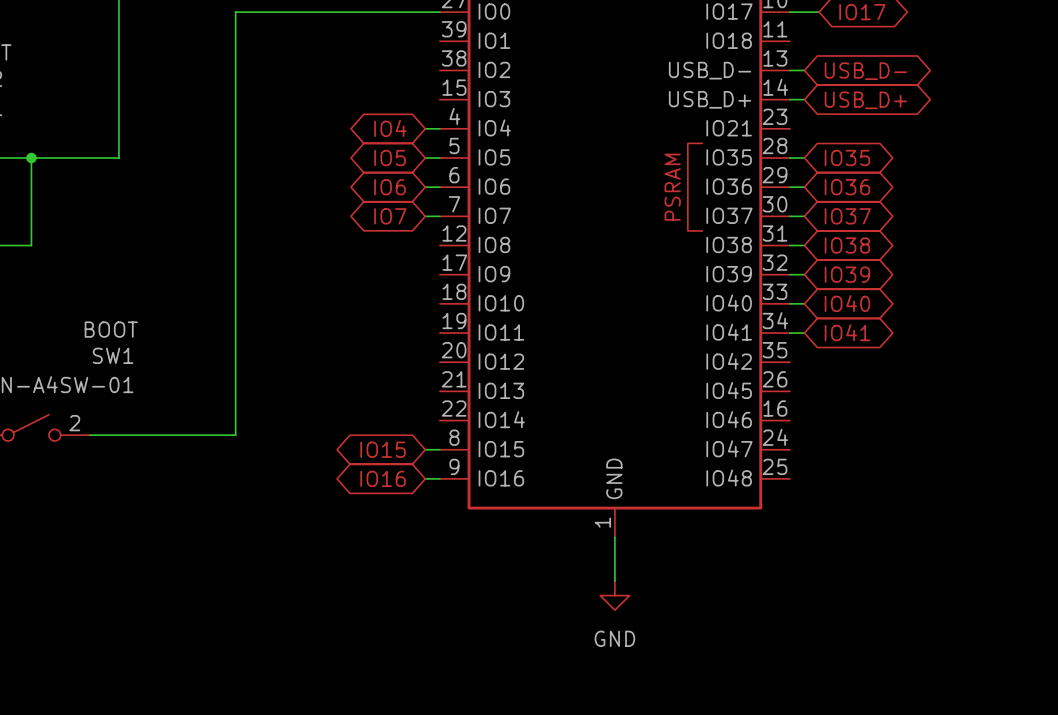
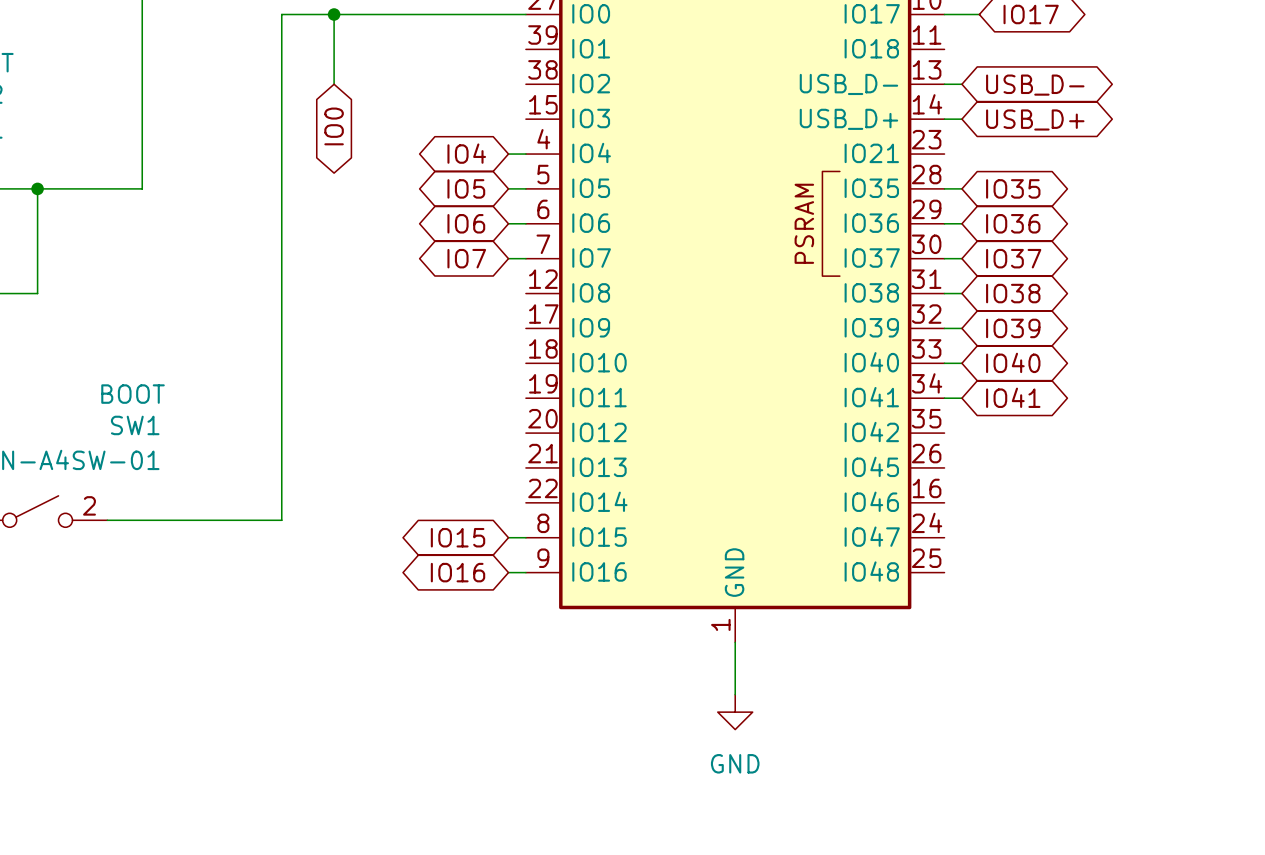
wire: none -> (334, 14) (334, 84)
junction: none -> (334, 14)
global label: none -> IO0 (334, 126)

